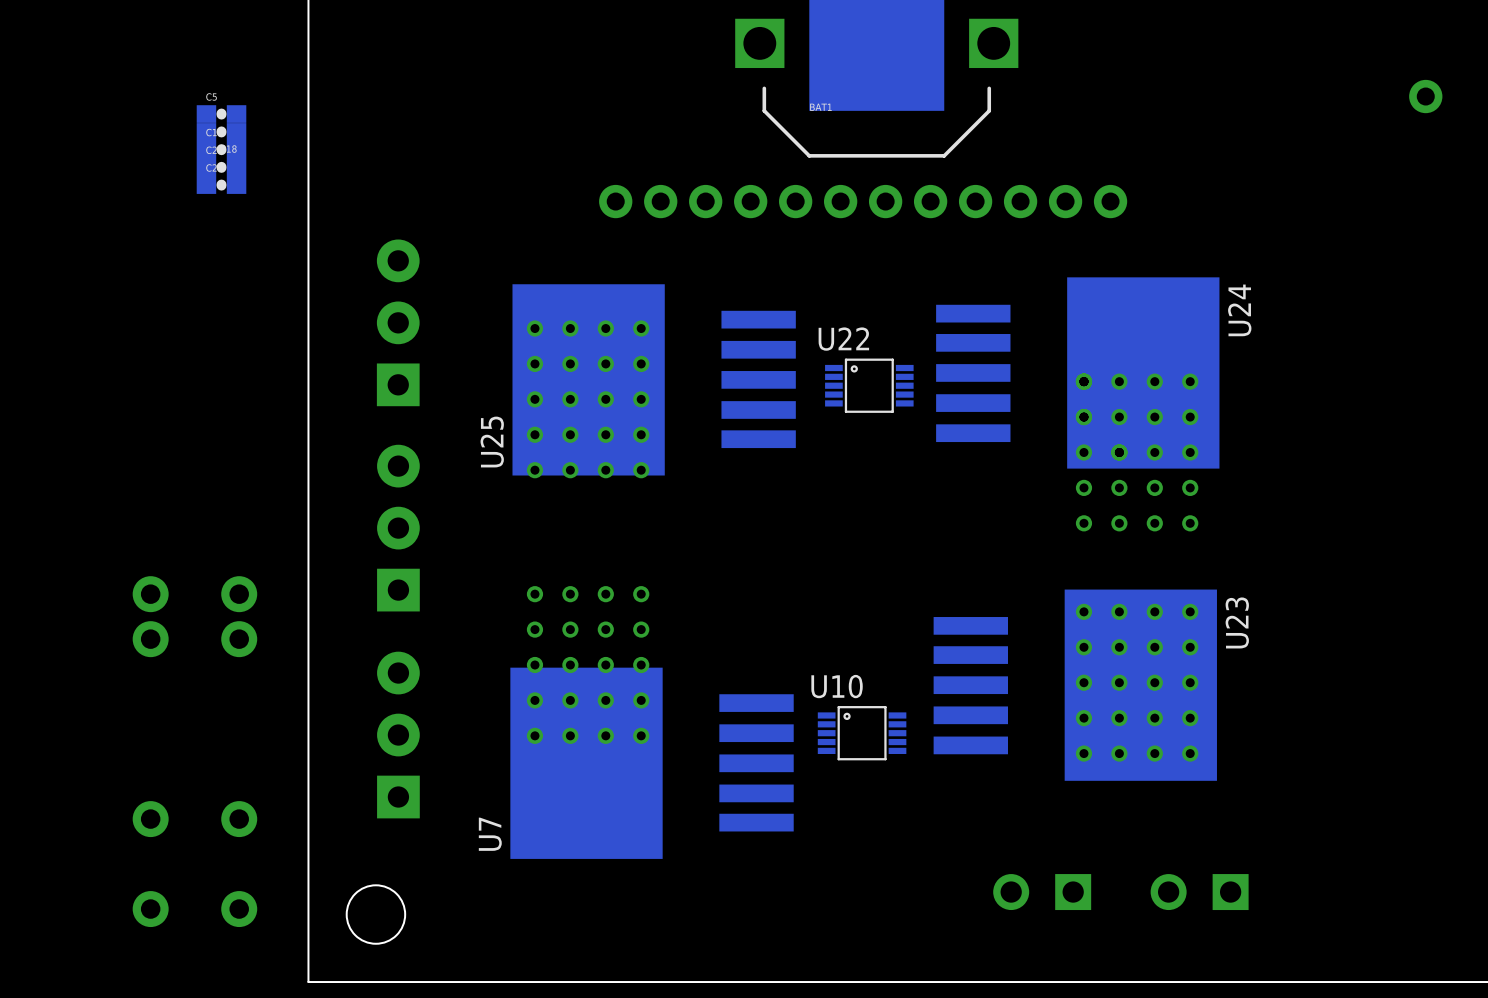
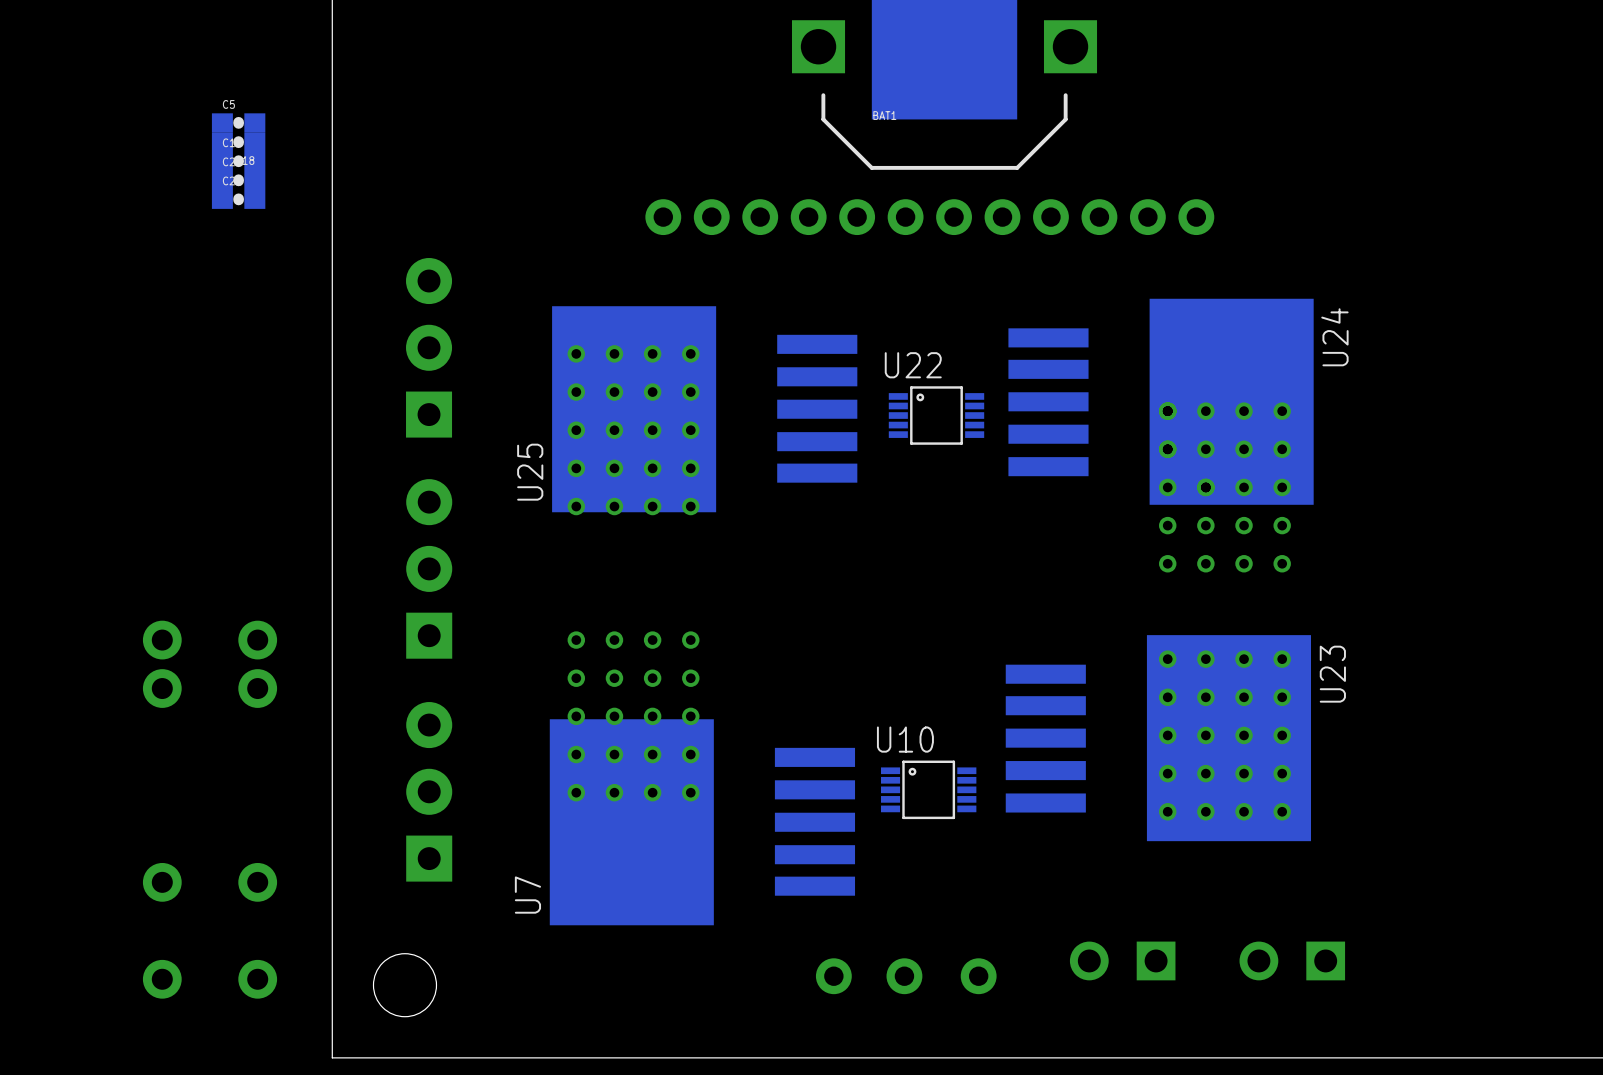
part: (1425, 96) -> none
part: none -> (833, 976)
part: none -> (904, 976)
part: none -> (978, 976)

